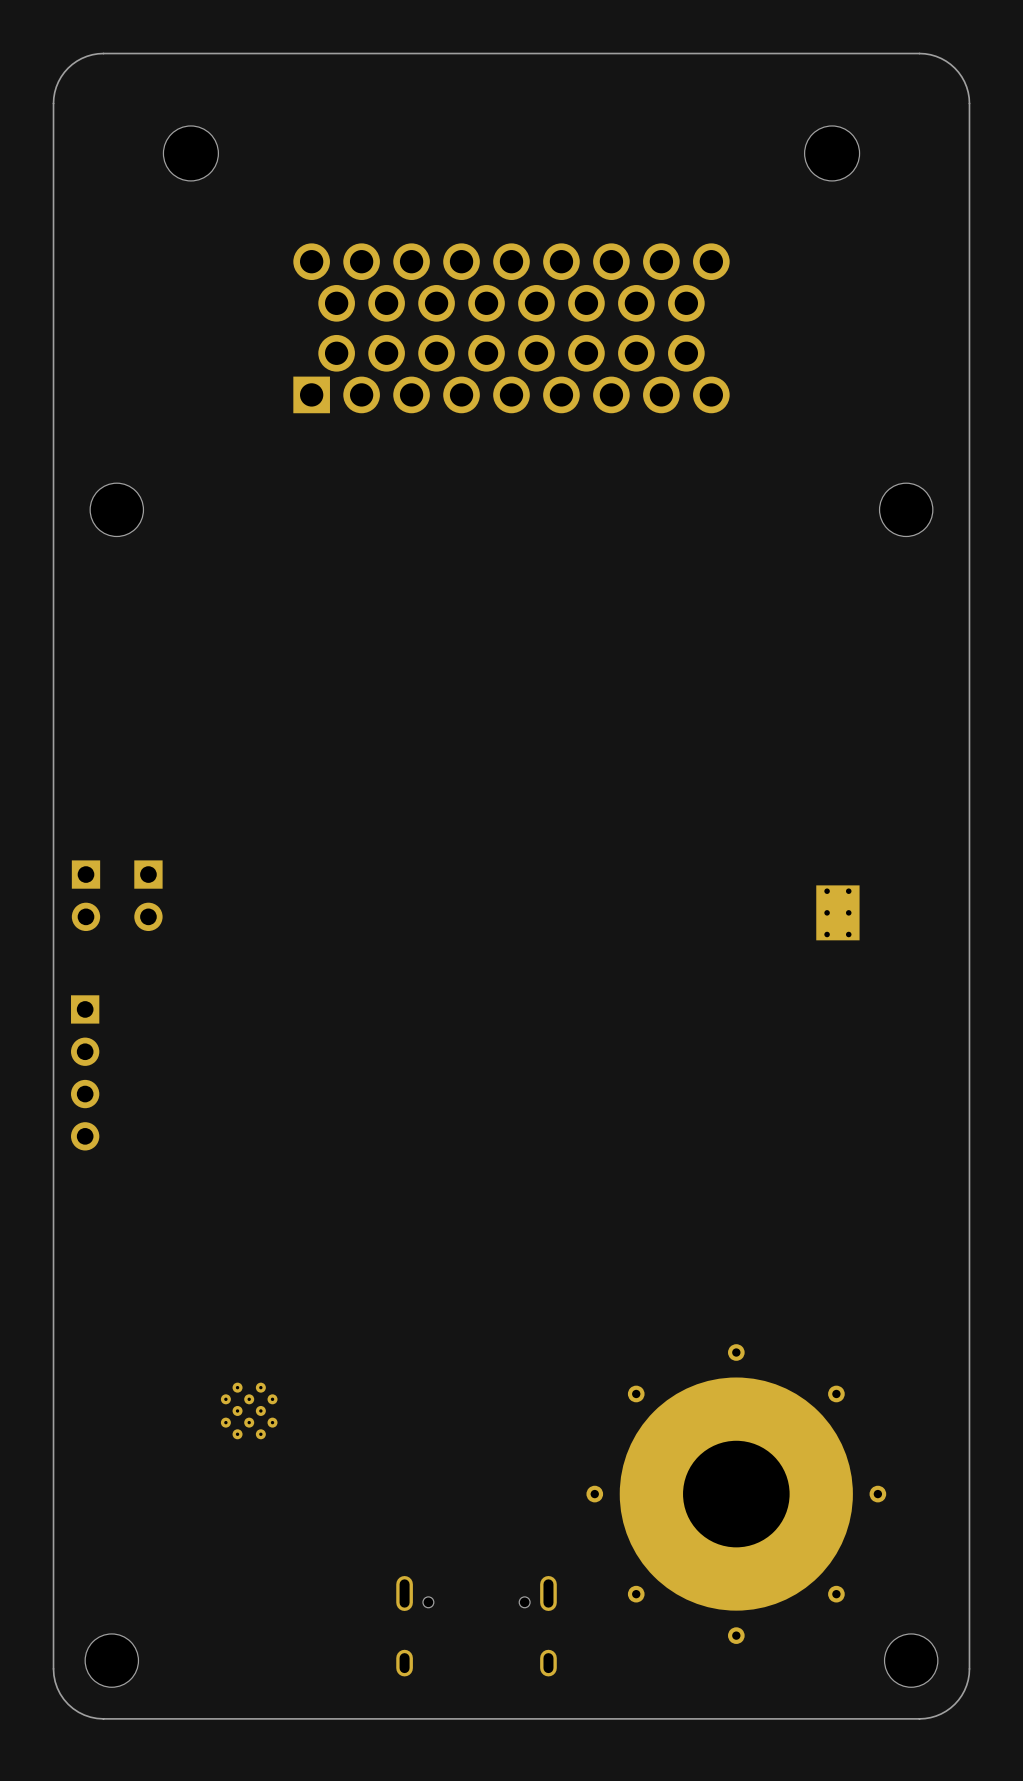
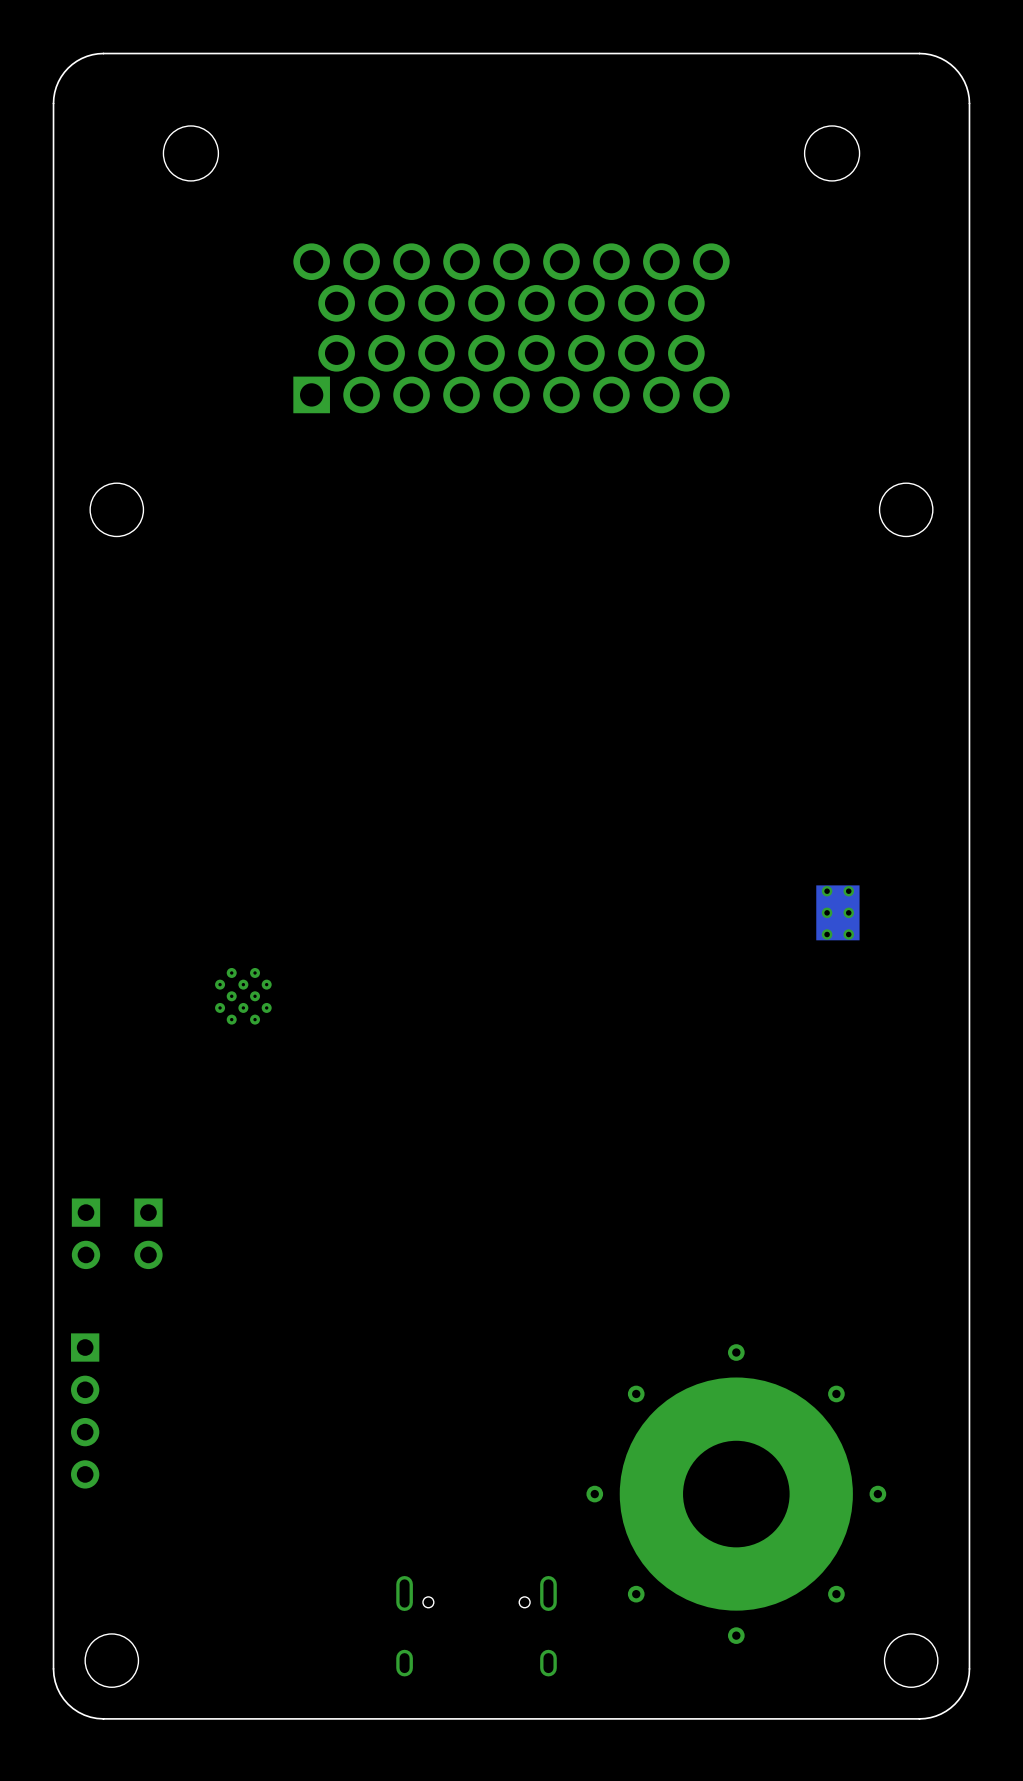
part: (85, 895) -> none
part: (148, 895) -> none
part position: (85, 1072) -> (85, 1410)
part: none -> (85, 1233)
part: none -> (148, 1233)
part position: (249, 1410) -> (243, 996)

